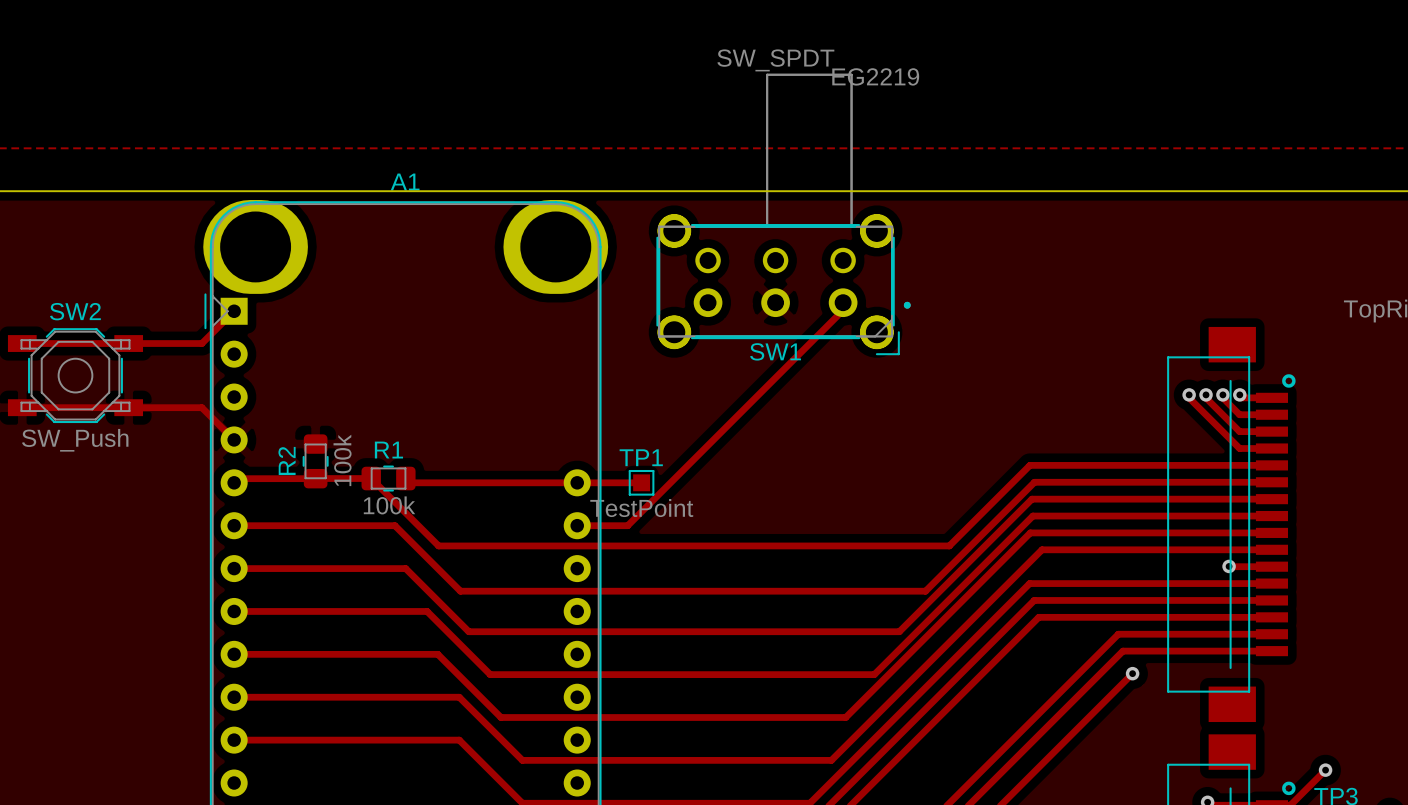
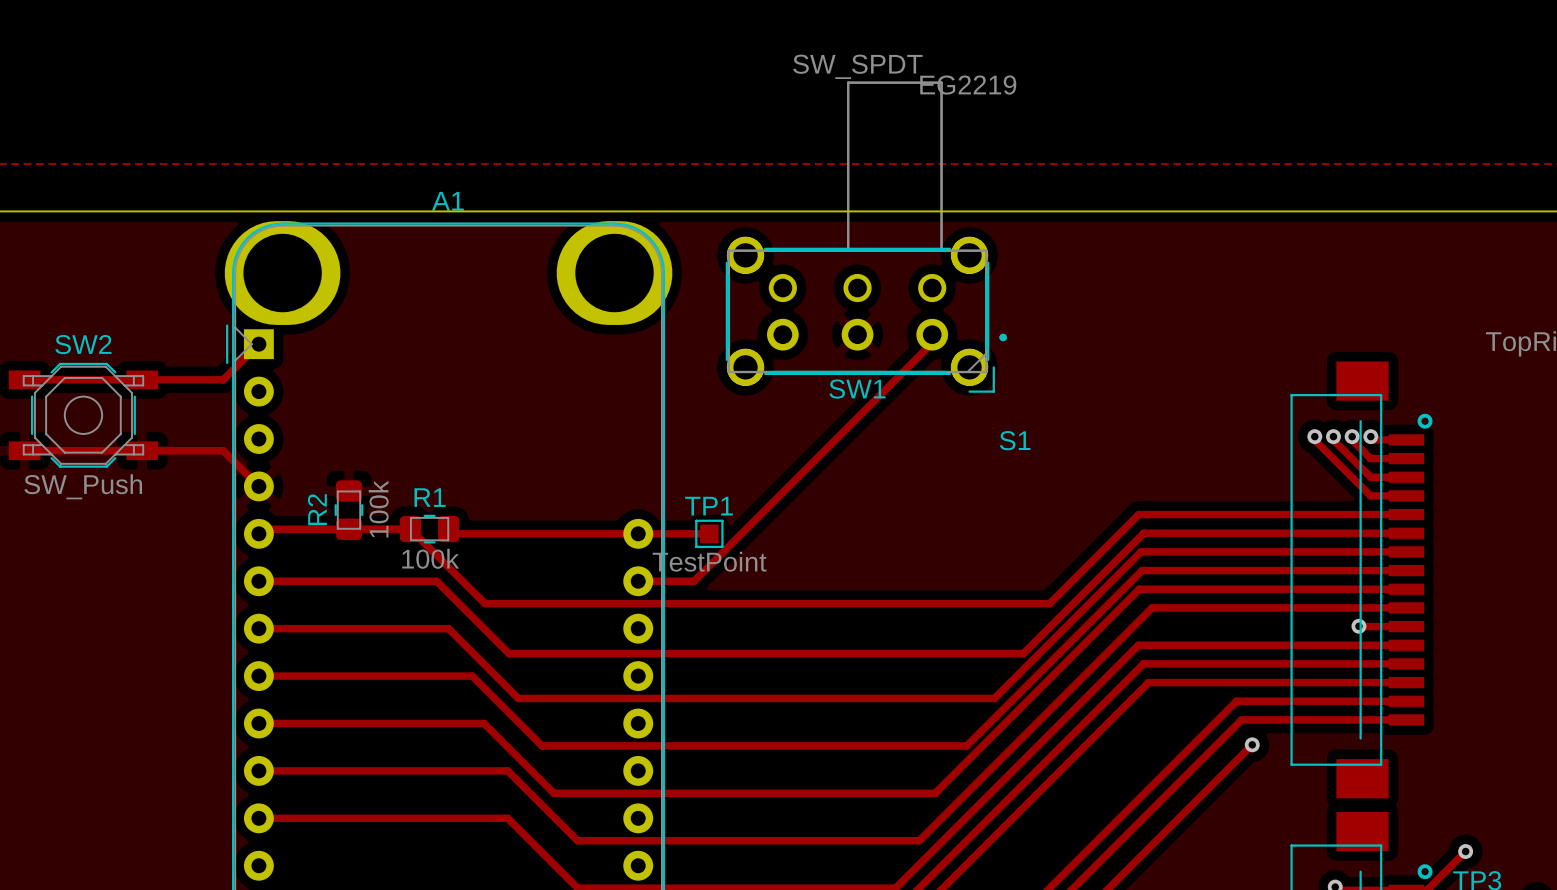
S1 name: none -> S1 (1015, 440)

